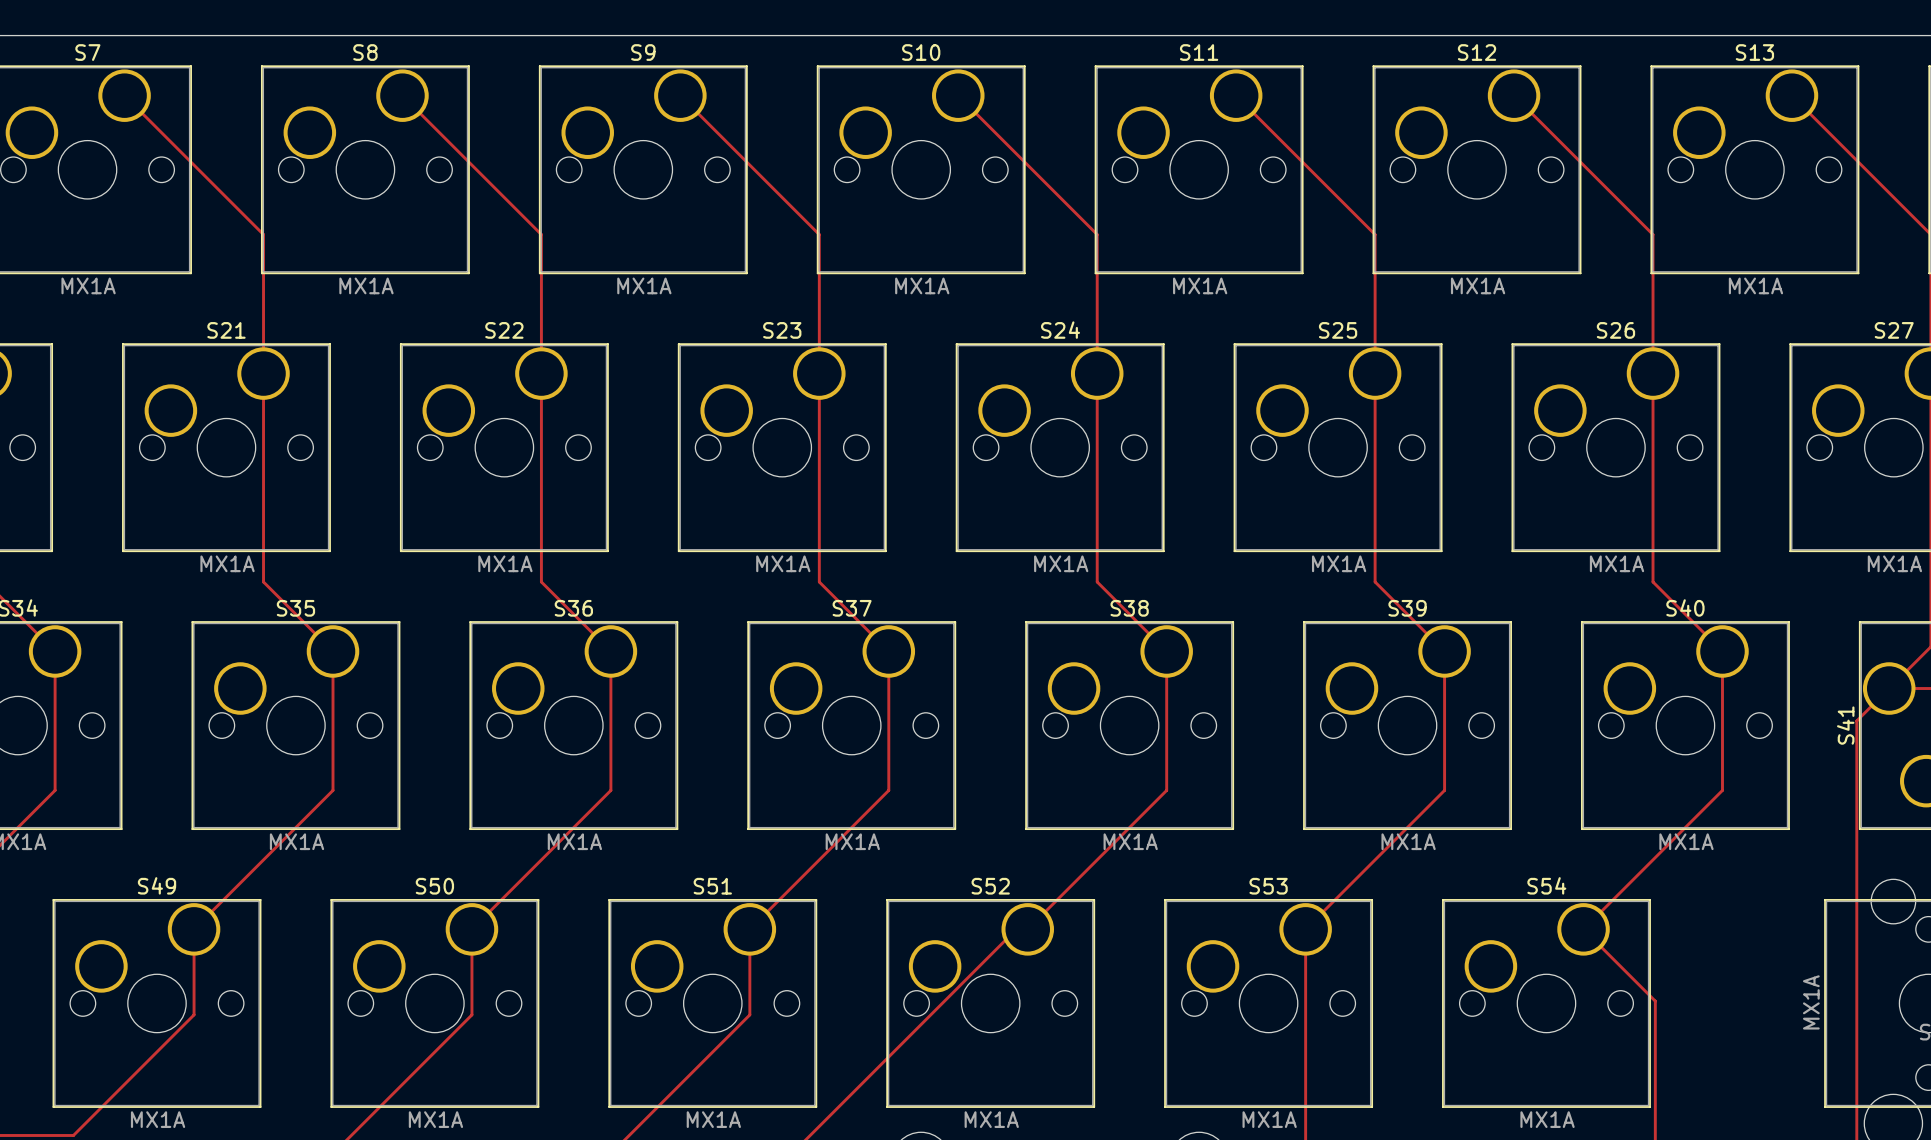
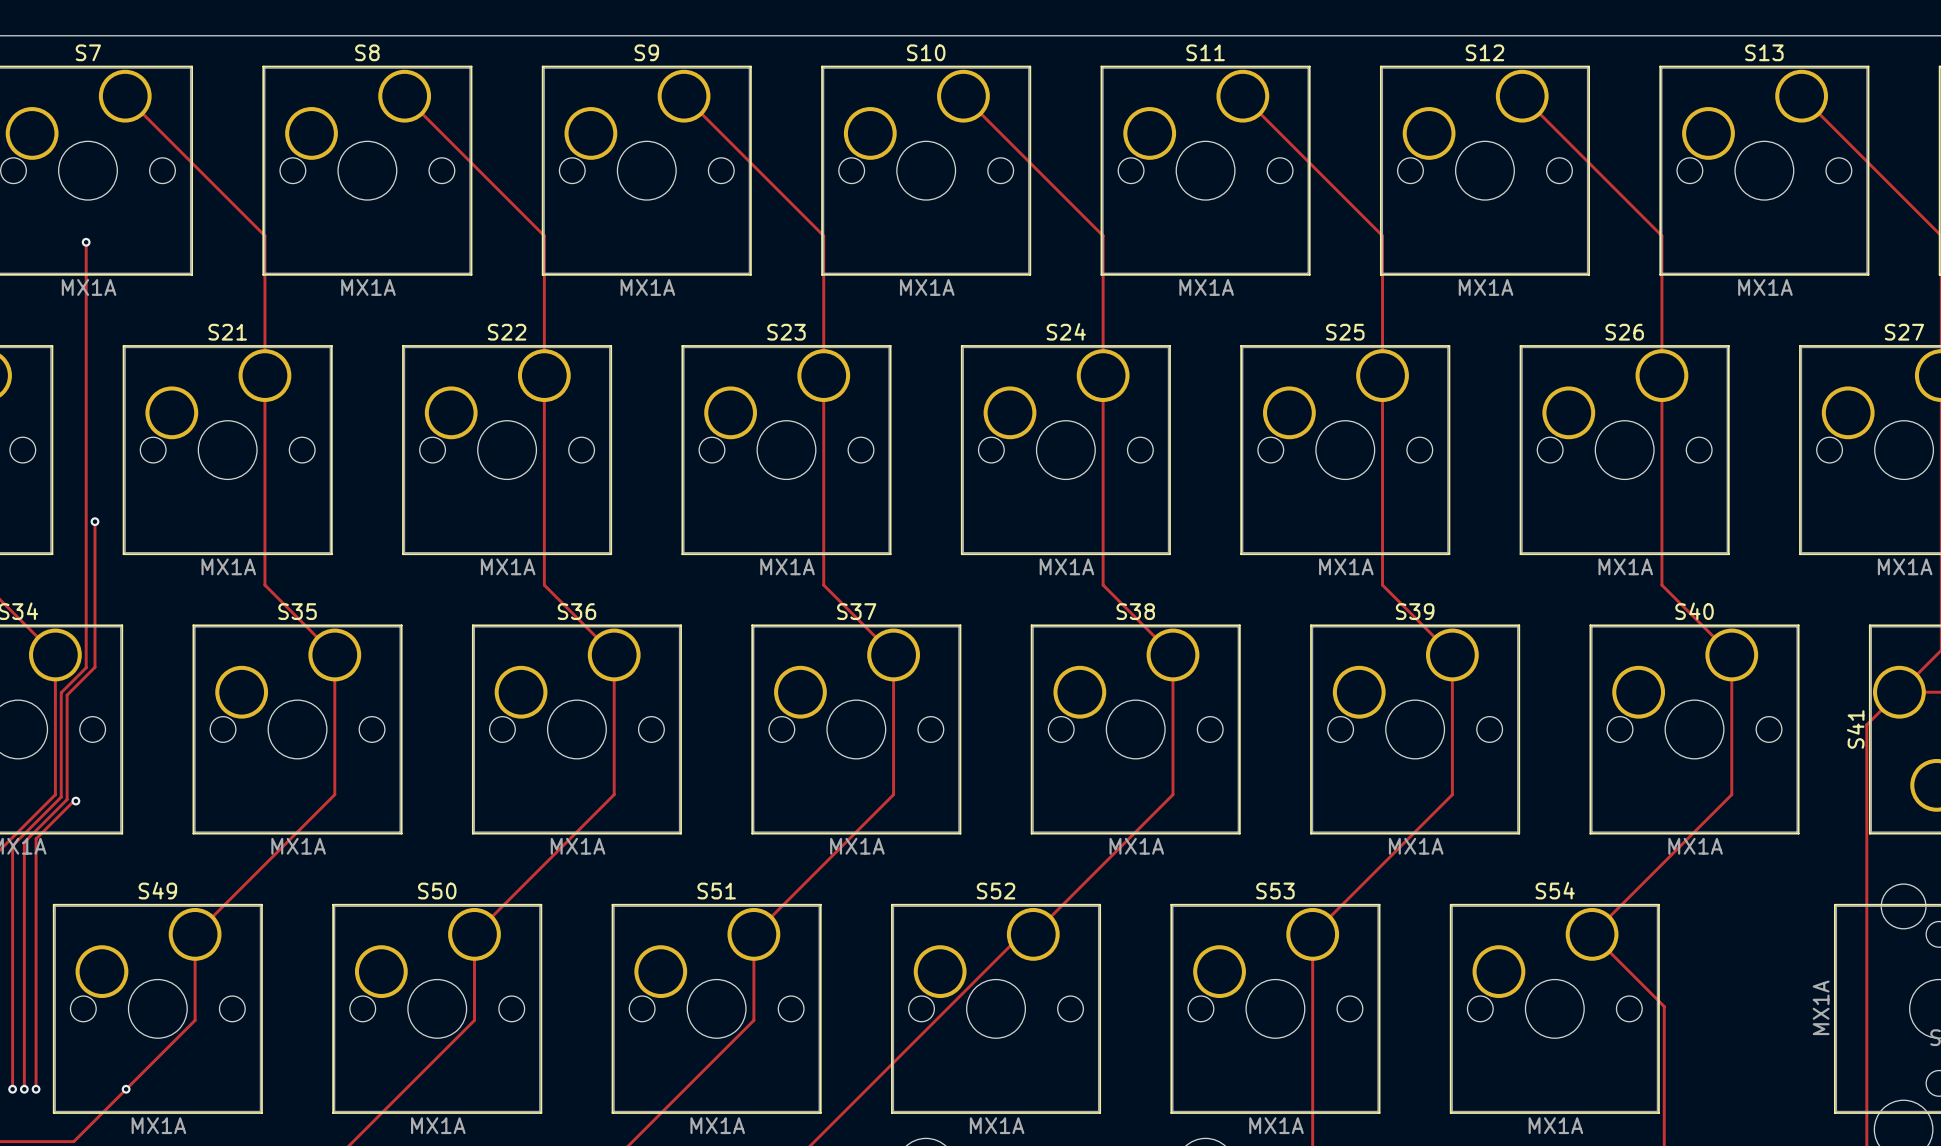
via: none -> (86, 242)
track: none -> (86, 242) (86, 667) (61, 692) (61, 797) (12, 845) (12, 1089)
track: none -> (95, 521) (95, 667) (67, 695) (67, 799) (24, 842) (24, 1089)
via: none -> (95, 521)
track: none -> (75, 801) (36, 838) (36, 1089)
via: none -> (75, 801)
via: none -> (12, 1089)
via: none -> (24, 1089)
via: none -> (36, 1089)
via: none -> (126, 1089)

